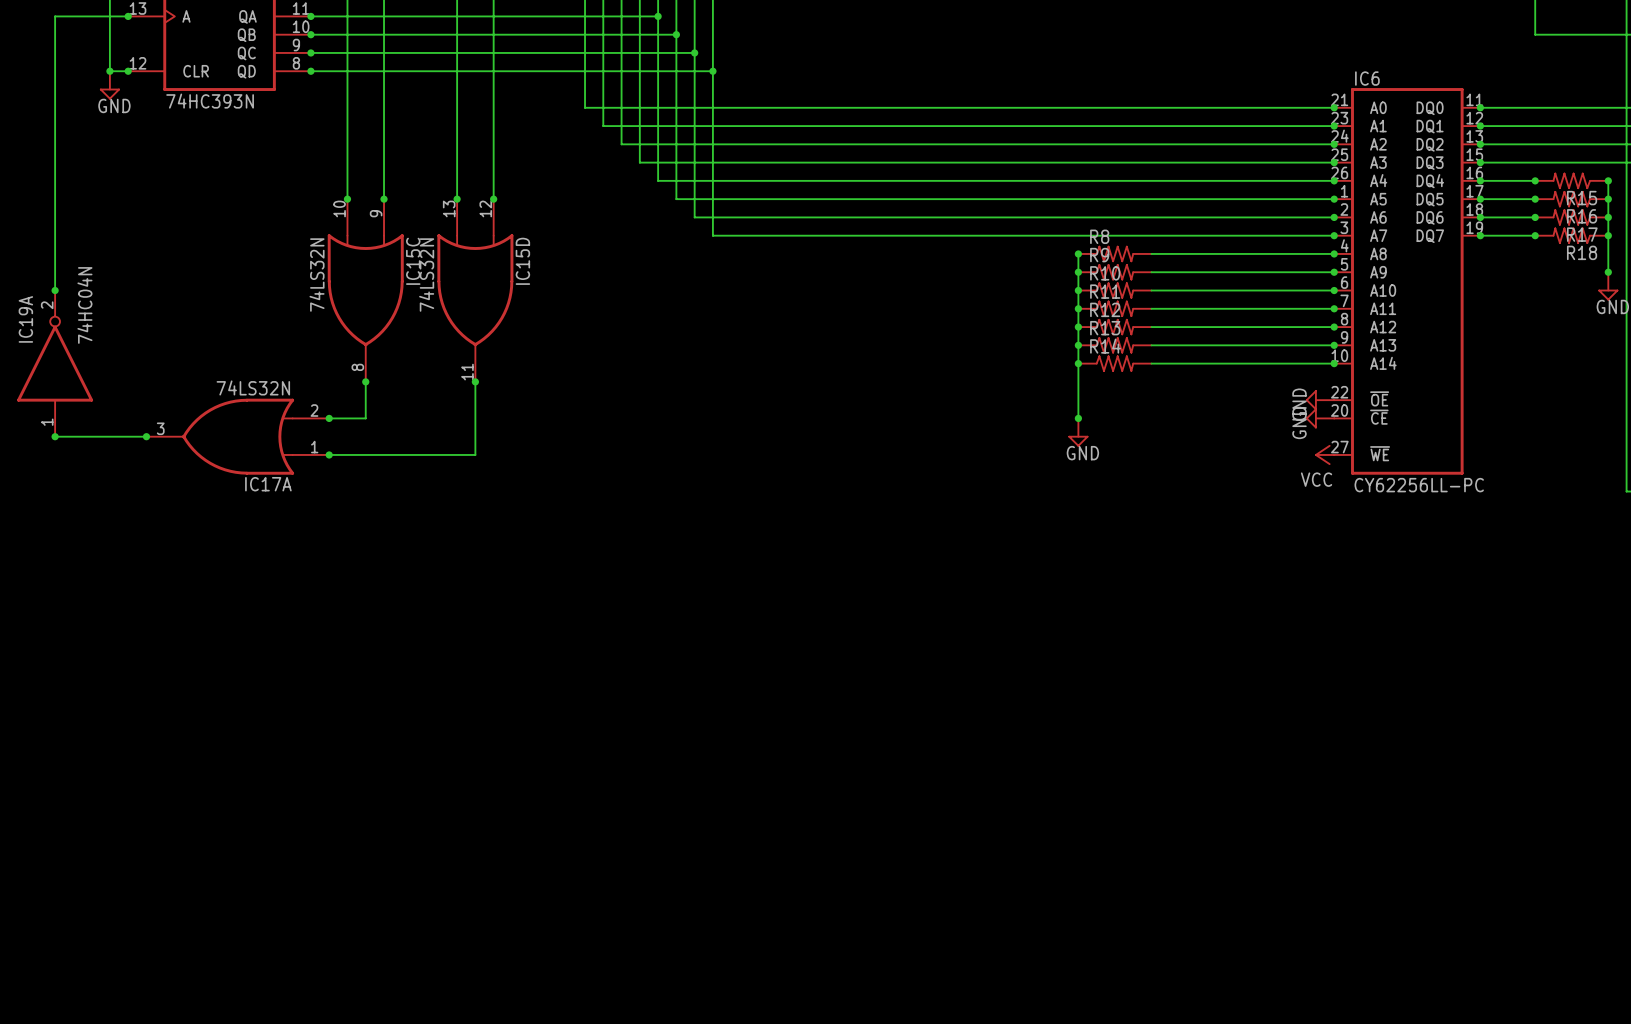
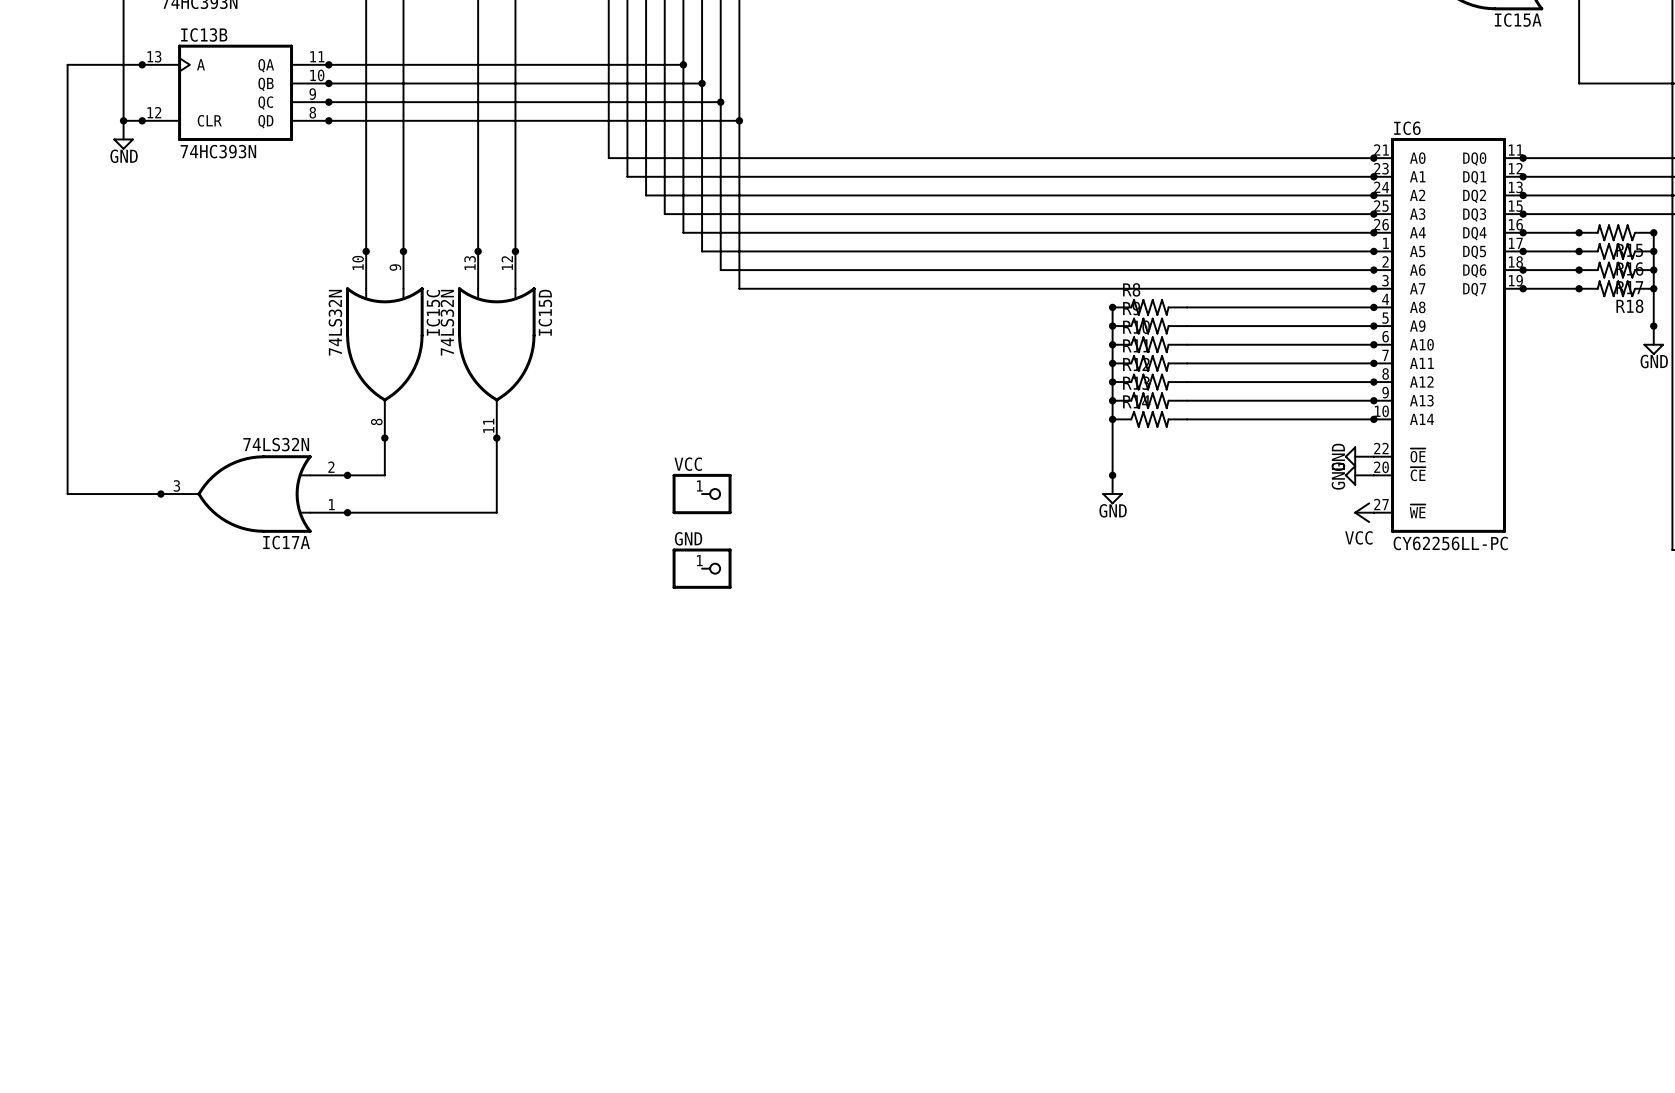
wire: none -> (67, 344) (67, 494)
junction: (55, 290) -> none
IC19A: 74HC04N (55, 363) -> none
junction: (55, 436) -> none
VCC: none -> (702, 494)
GND: none -> (702, 568)

